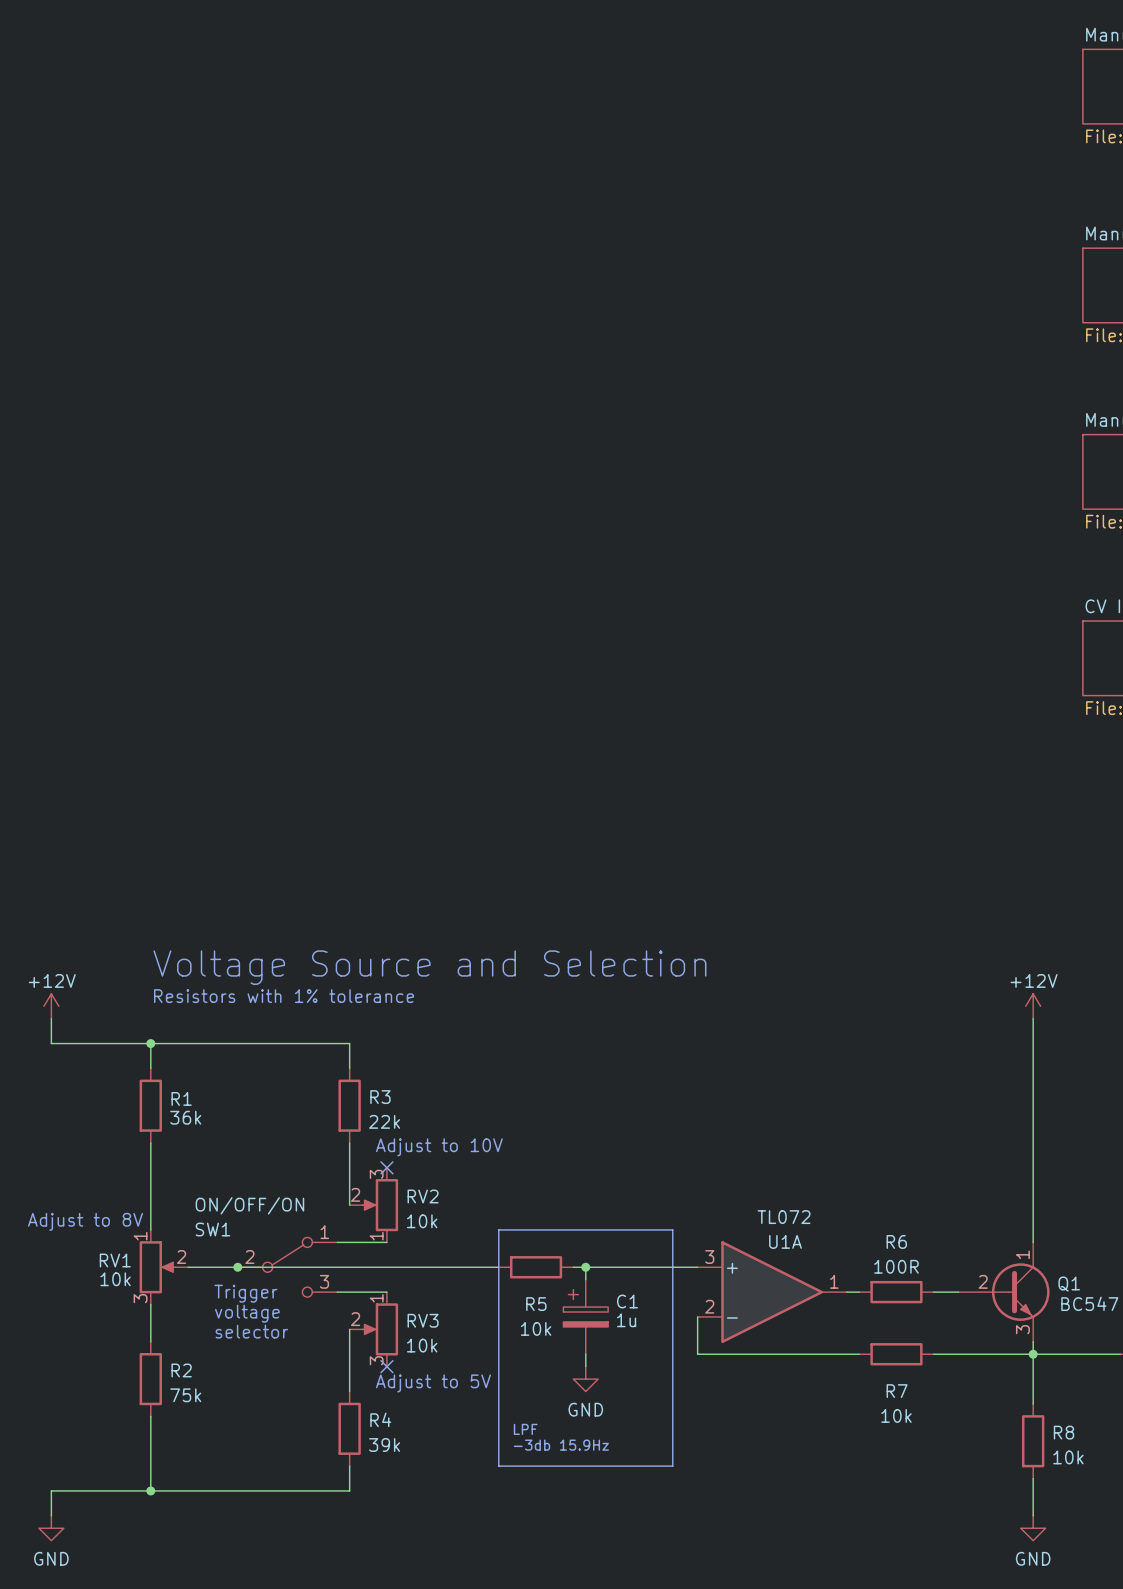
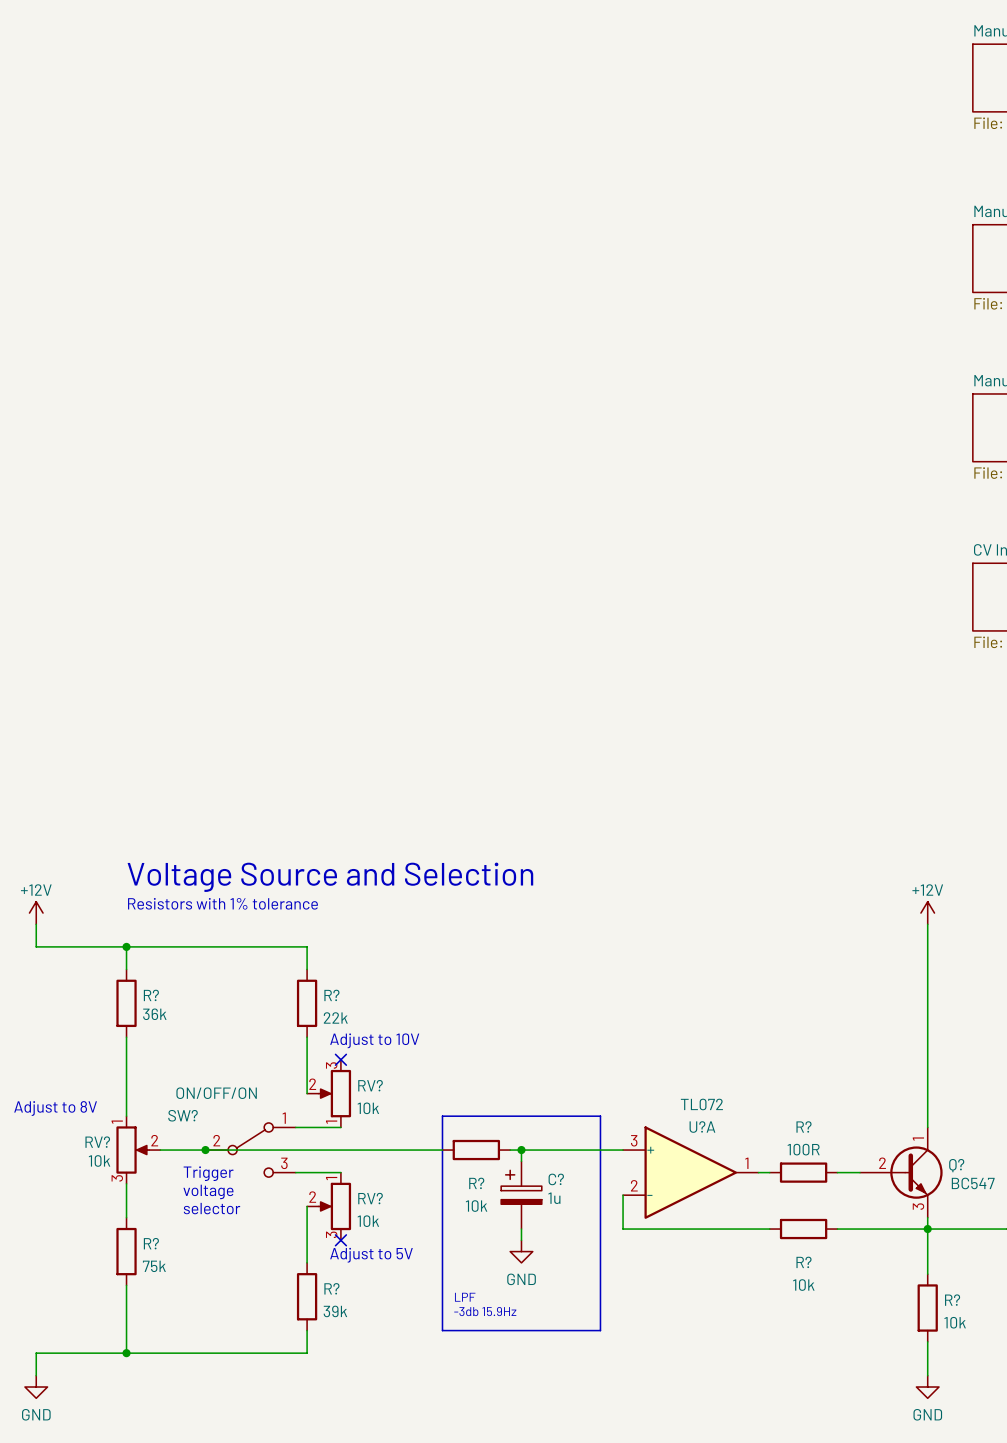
R3 name: R3 (380, 1097) -> R? (331, 995)
R1 name: R1 (181, 1098) -> R? (151, 995)
RV2 name: RV2 (423, 1196) -> RV? (370, 1085)
SW1 name: SW1 (212, 1229) -> SW? (183, 1115)
U1A name: U1A (785, 1241) -> U?A (702, 1127)
R6 name: R6 (896, 1241) -> R? (804, 1126)
RV1 name: RV1 (115, 1260) -> RV? (97, 1142)
Q1 name: Q1 (1069, 1284) -> Q? (956, 1165)
C1 name: C1 (627, 1301) -> C? (556, 1179)
R5 name: R5 (536, 1304) -> R? (476, 1183)
RV3 name: RV3 (423, 1320) -> RV? (370, 1198)
R2 name: R2 (181, 1370) -> R? (151, 1243)
R7 name: R7 (897, 1391) -> R? (804, 1262)
R4 name: R4 (380, 1419) -> R? (331, 1288)
R8 name: R8 (1063, 1432) -> R? (952, 1300)

